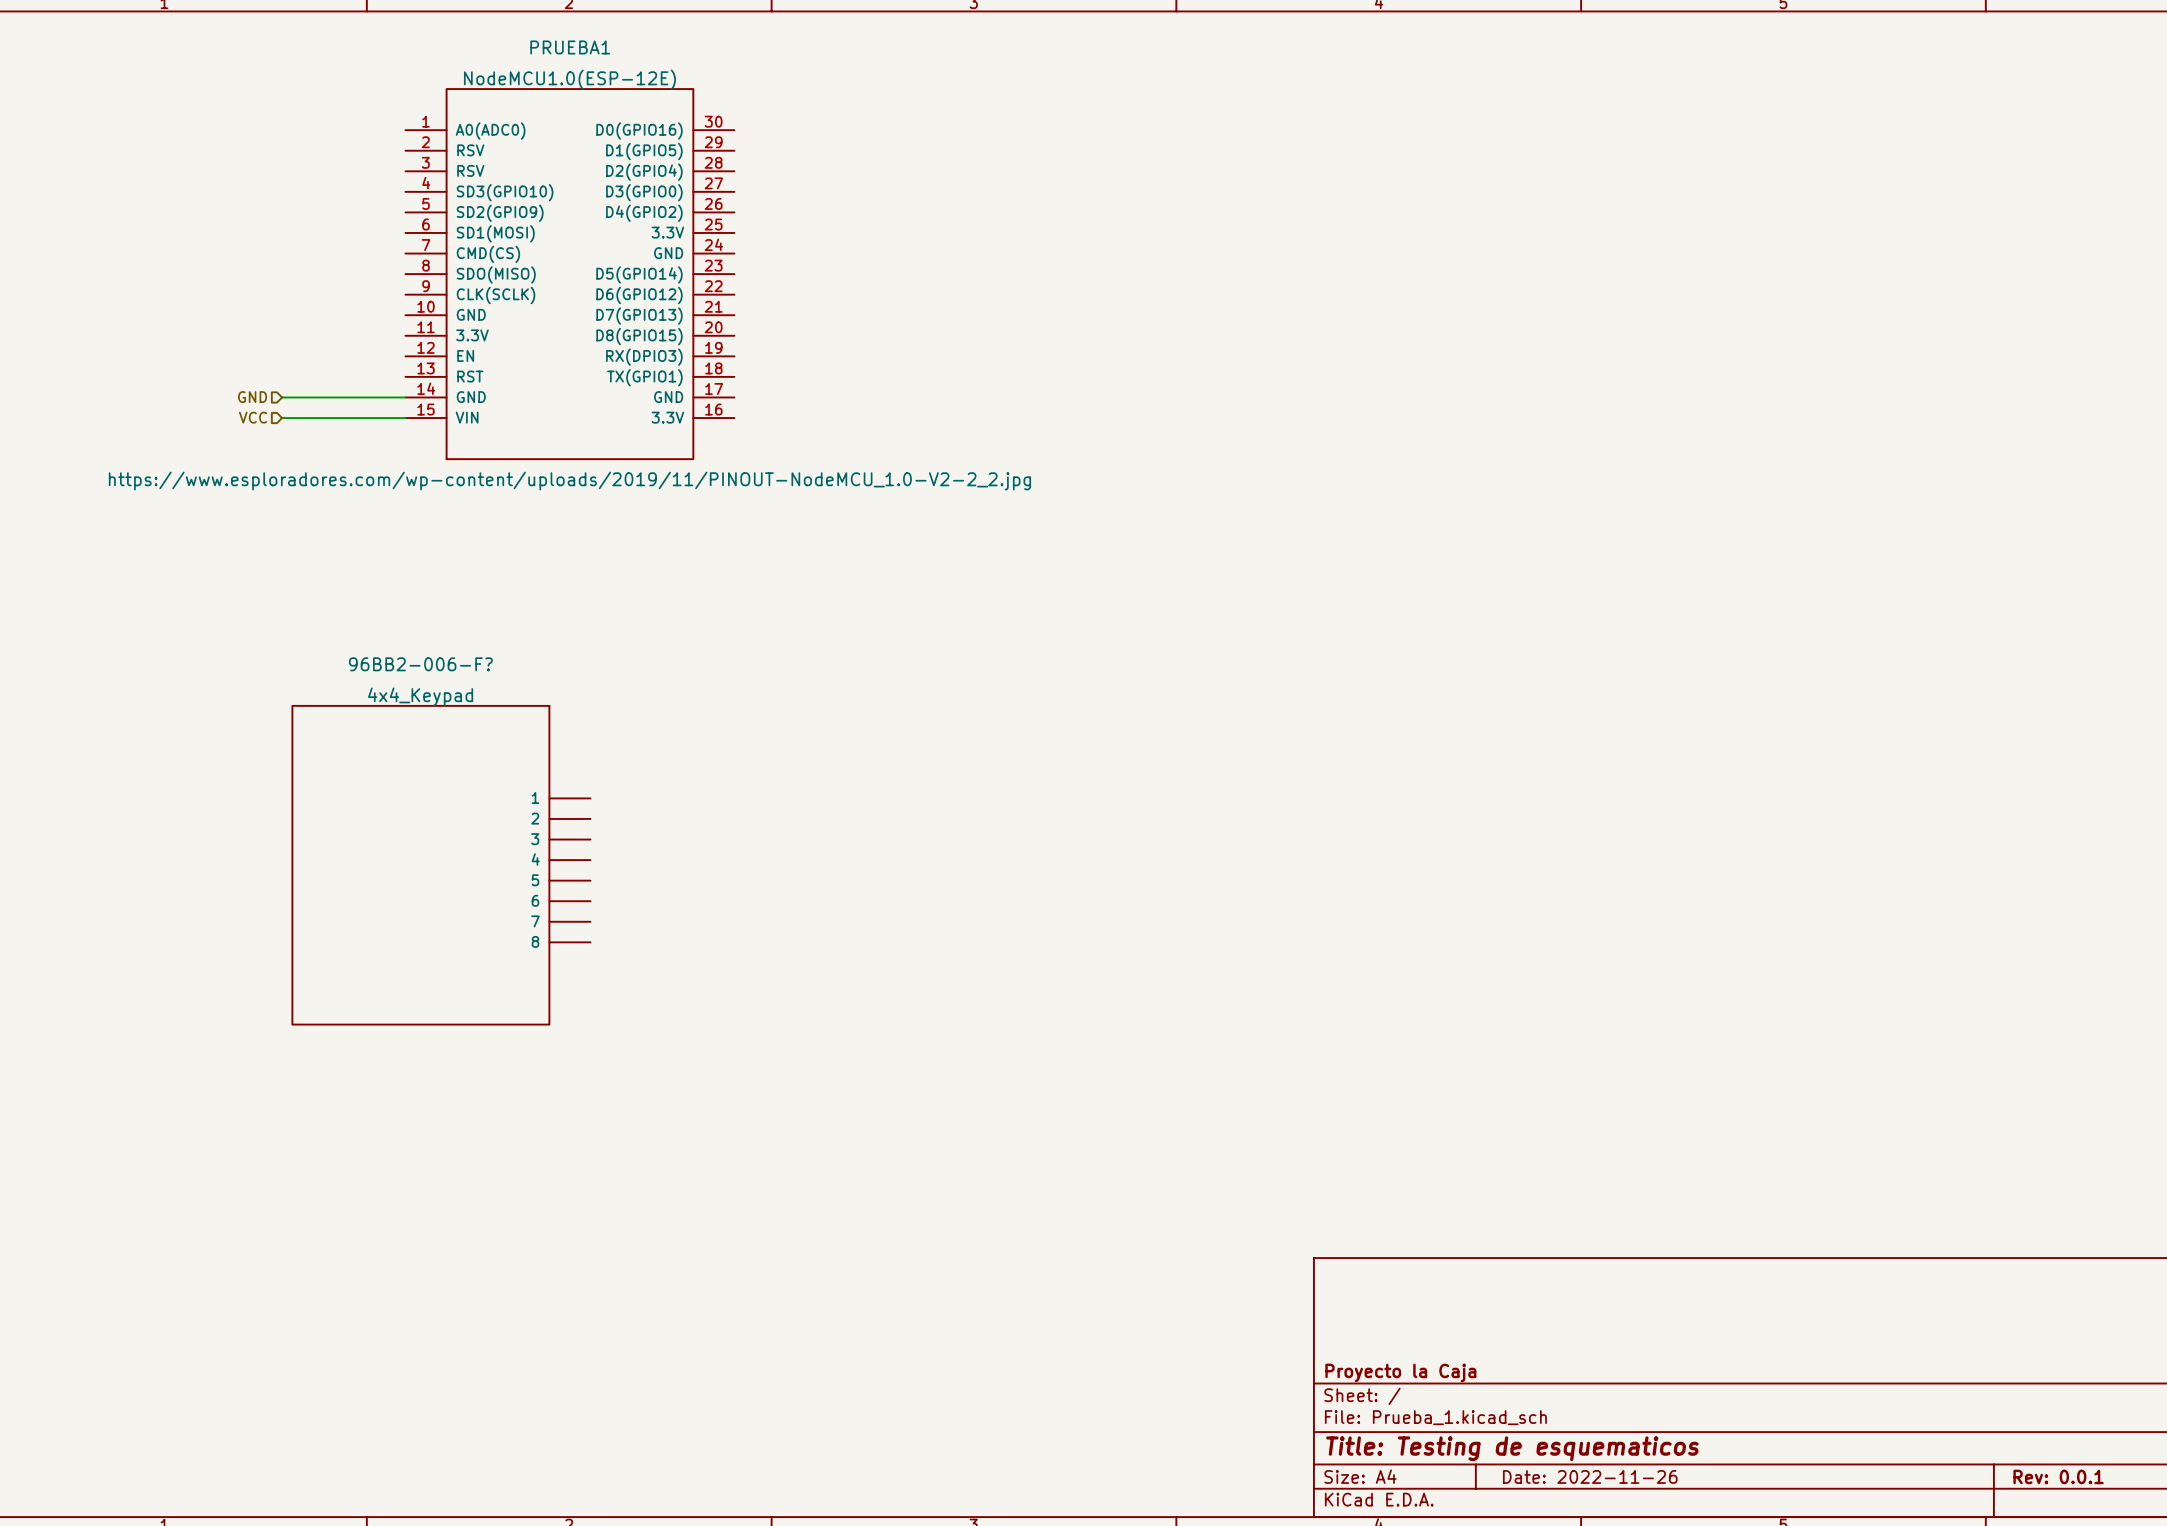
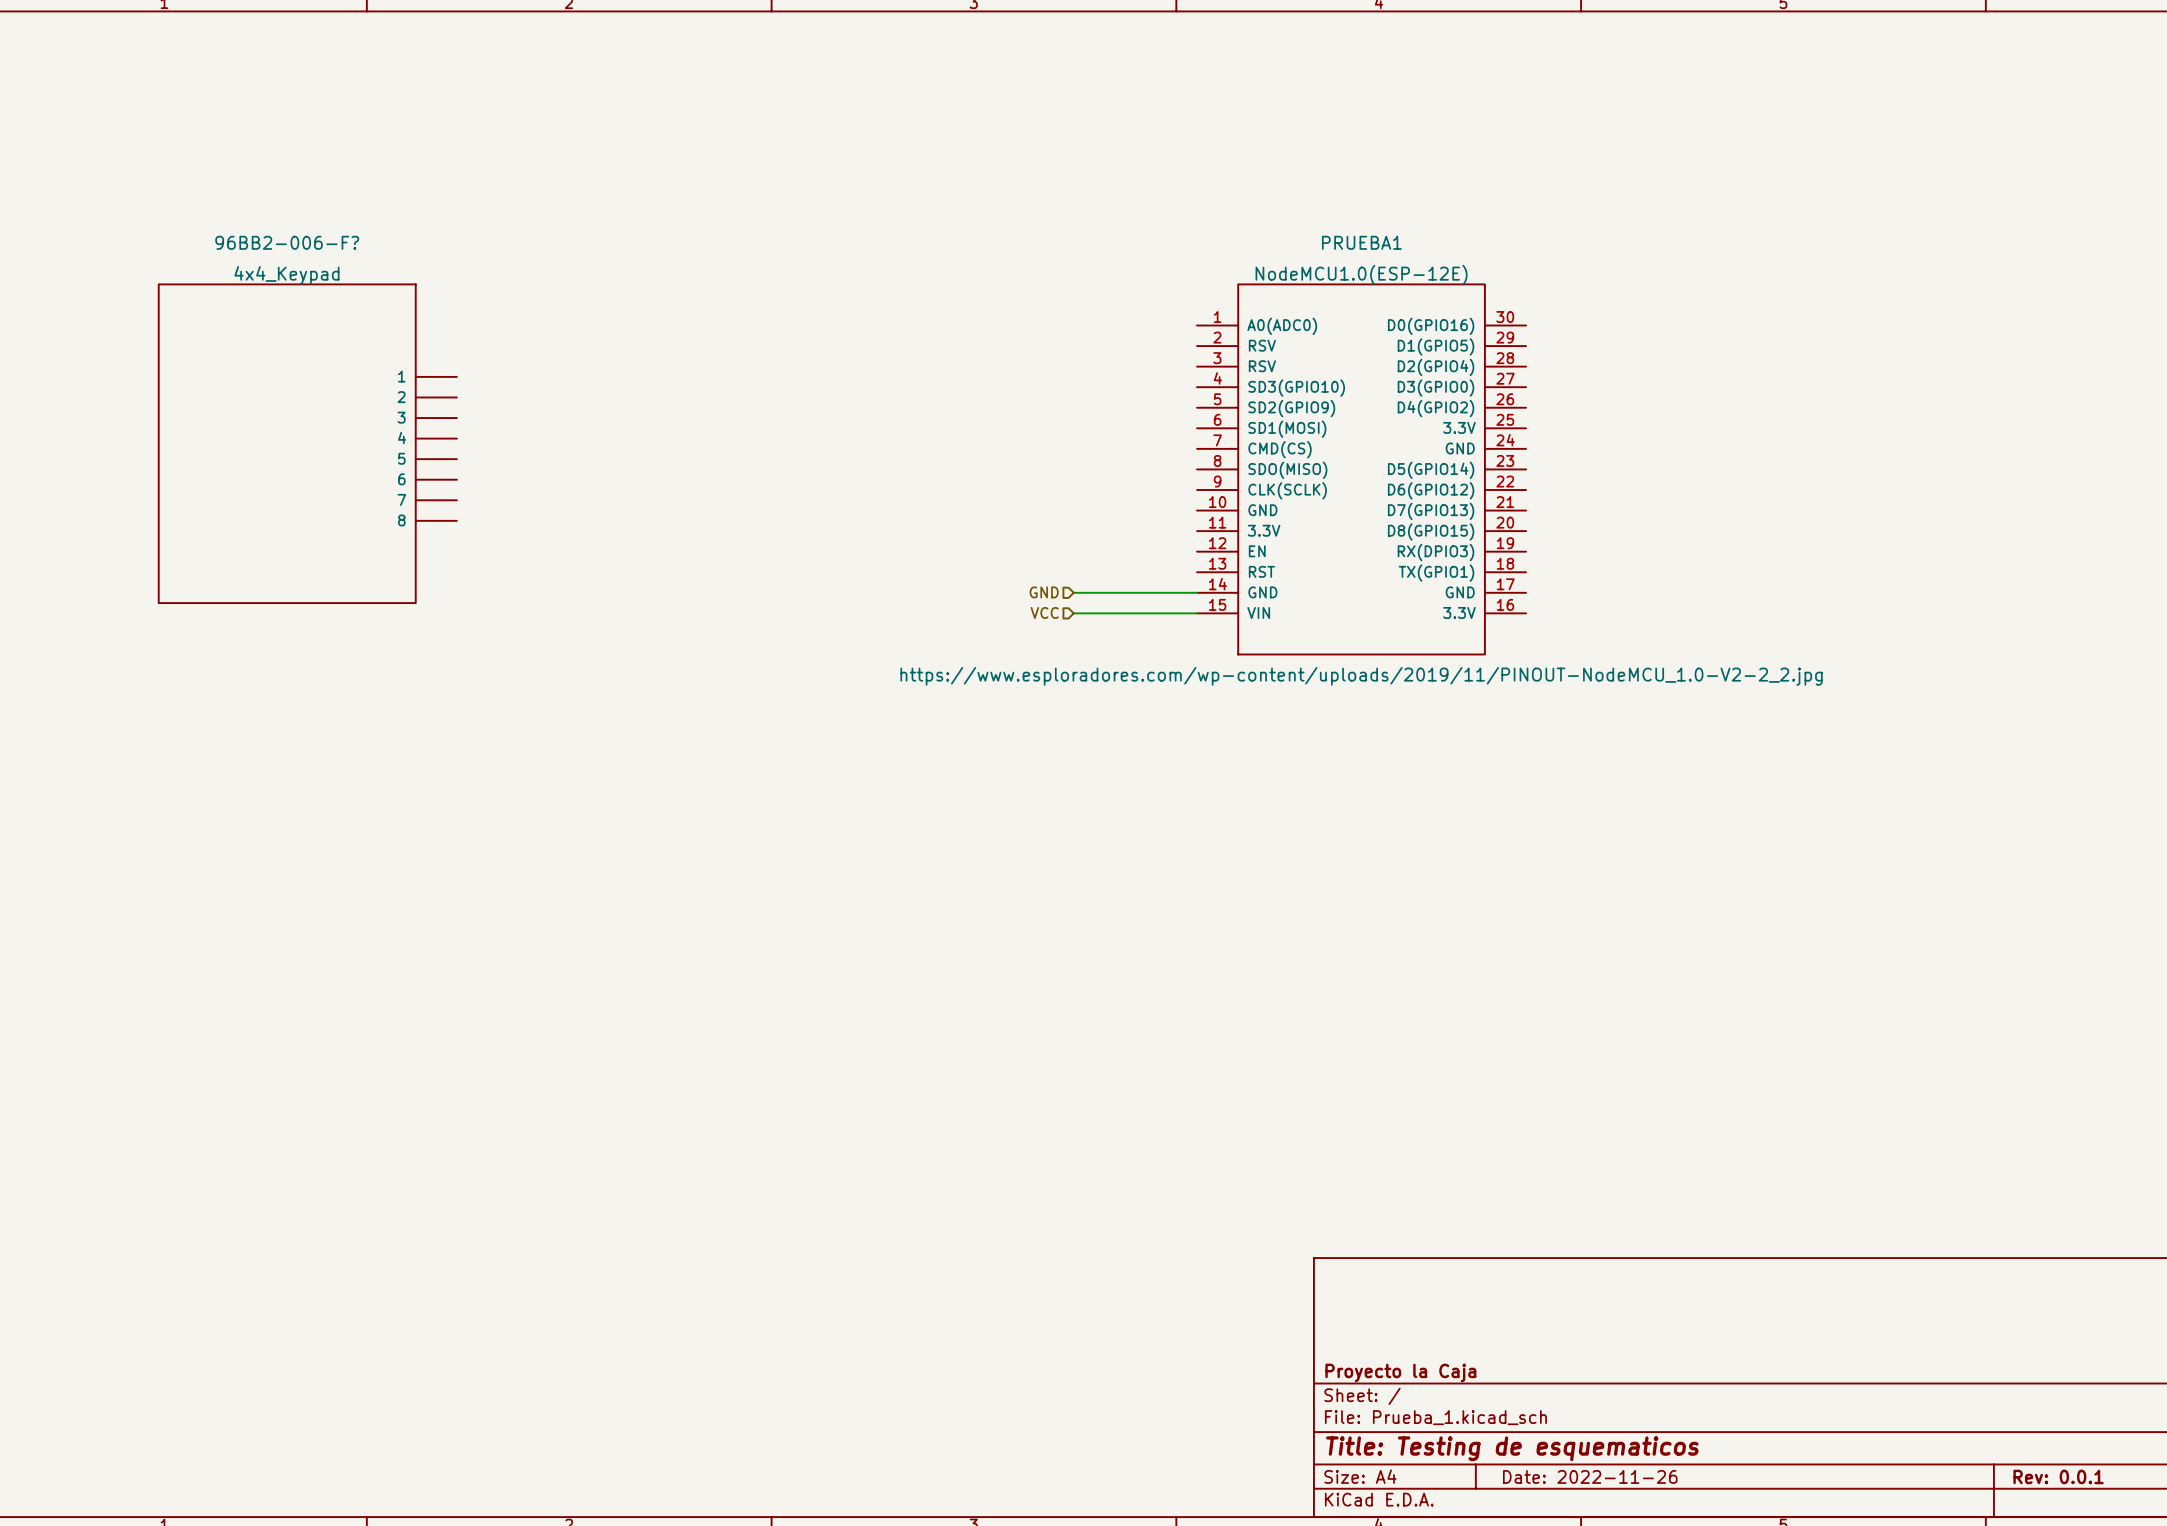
PRUEBA1 position: (569, 274) -> (1361, 469)
hierarchical label: GND (252, 397) -> none
wire: (282, 397) (405, 397) -> none
hierarchical label: VCC (253, 417) -> none
wire: (282, 418) (405, 418) -> none
hierarchical label: none -> GND (1044, 592)
wire: none -> (1073, 592) (1197, 592)
hierarchical label: none -> VCC (1044, 612)
wire: none -> (1073, 613) (1197, 613)
96BB2-006-F? position: (441, 865) -> (307, 443)

